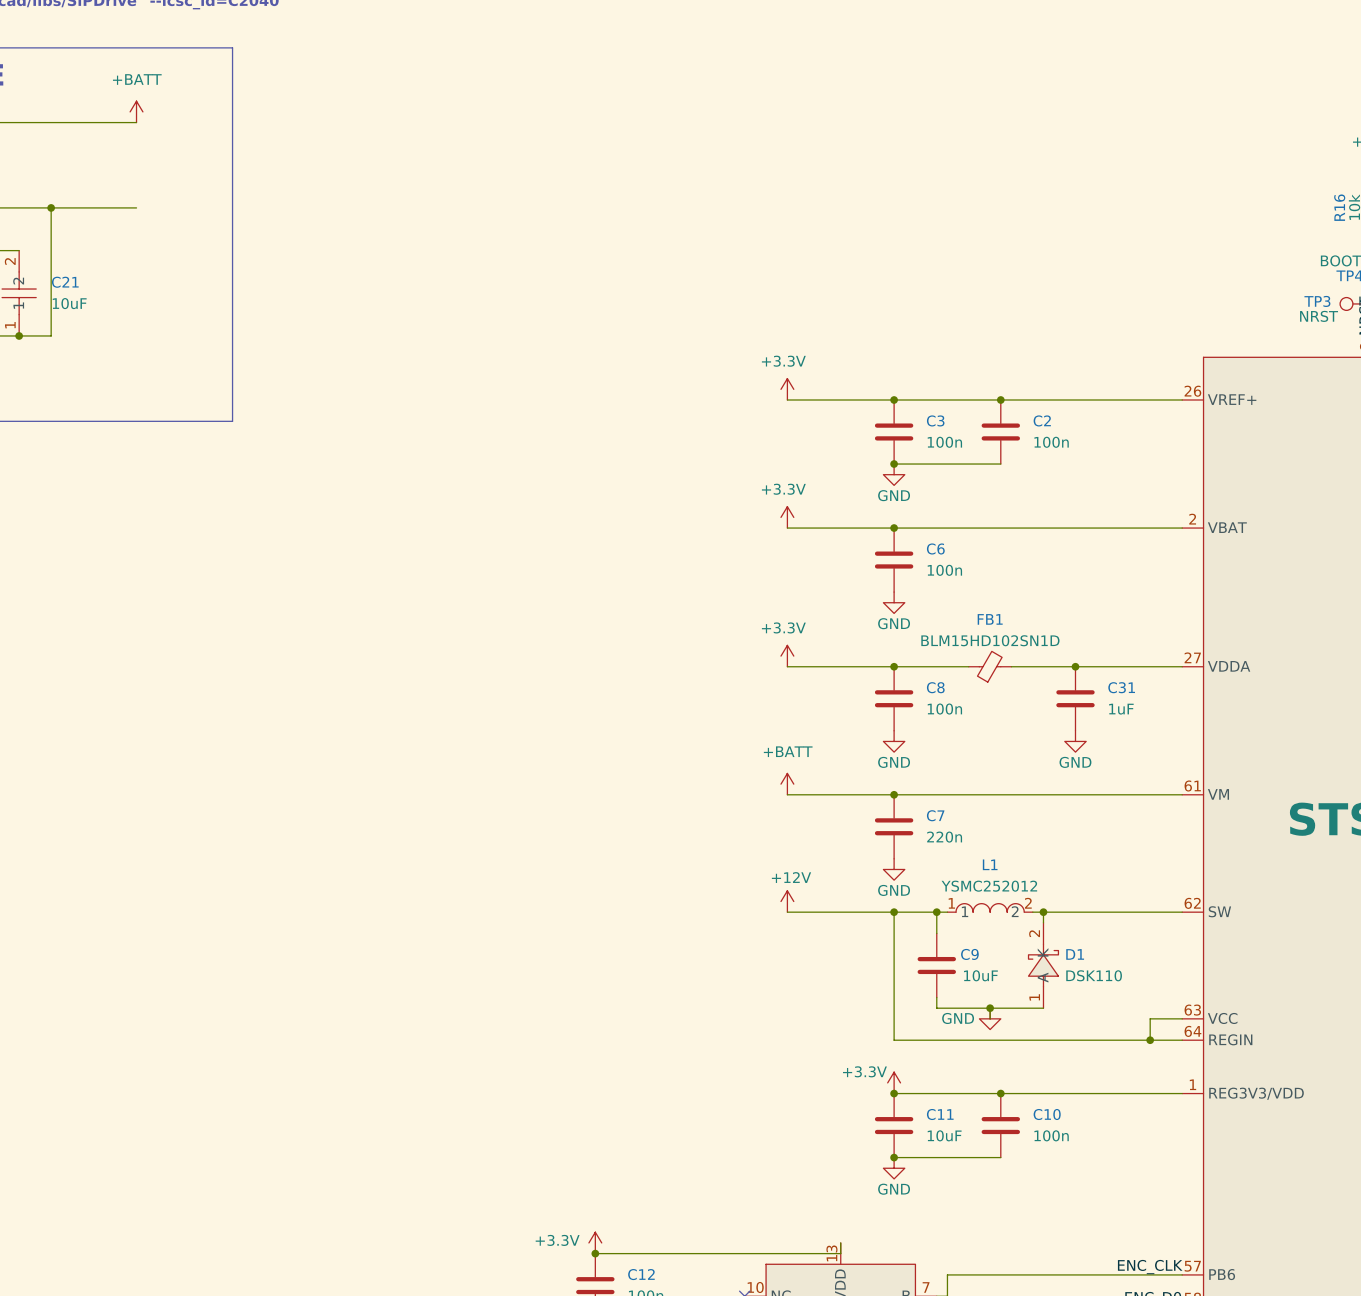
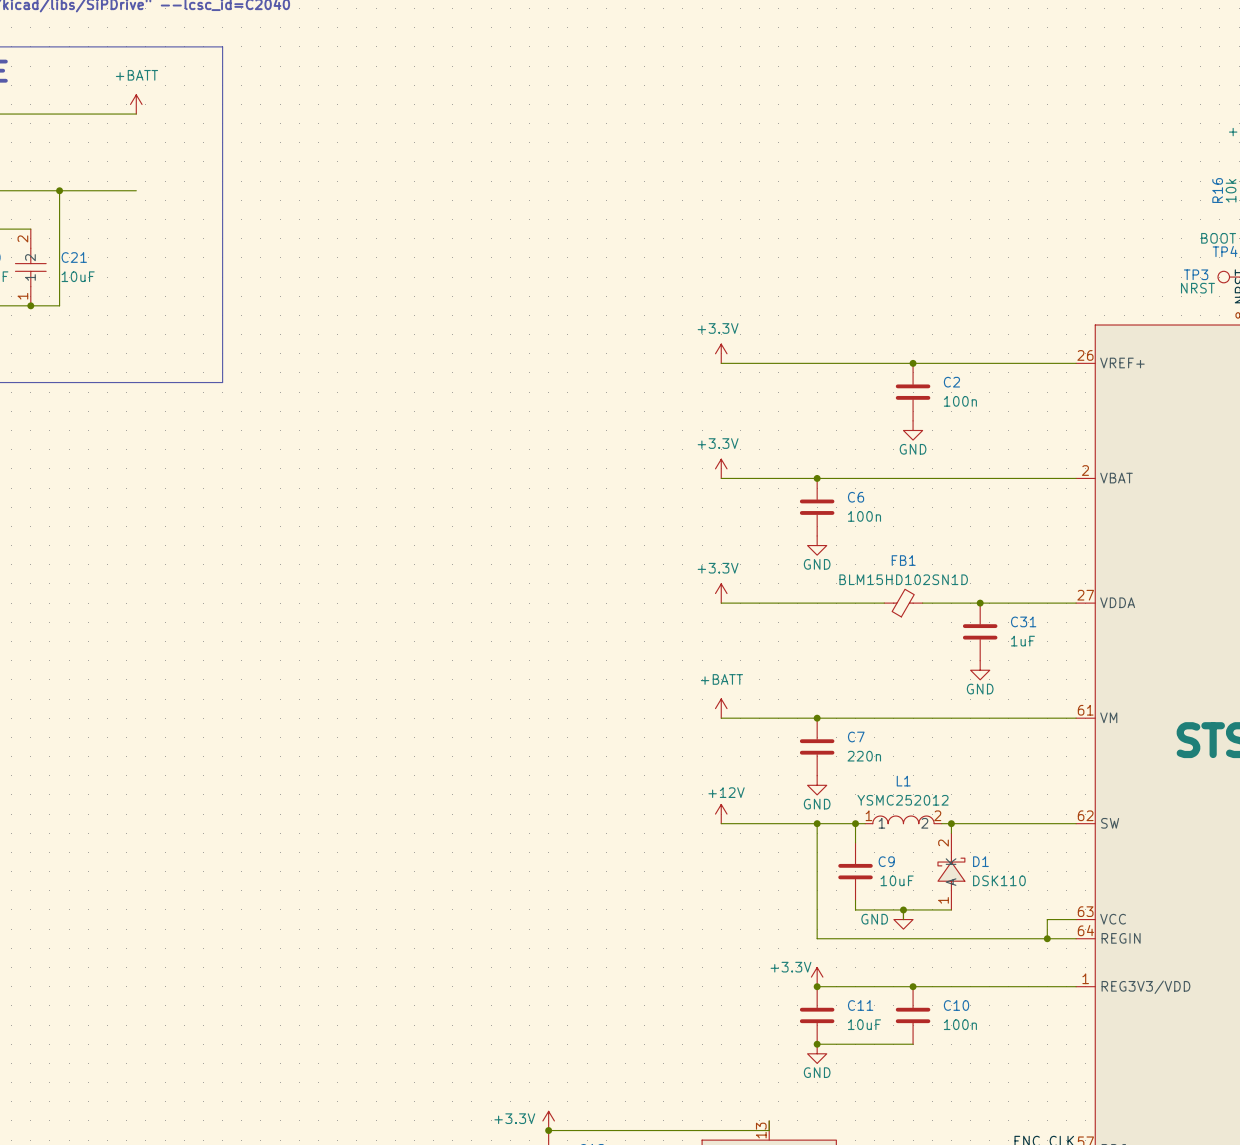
junction: (894, 400) -> none
C3: 100n (894, 432) -> none
wire: (894, 464) (1000, 464) -> none
junction: (894, 464) -> none
power symbol position: GND (894, 474) -> GND (913, 430)
junction: (894, 666) -> none
C8: 100n (894, 698) -> none
power symbol: GND (894, 741) -> none

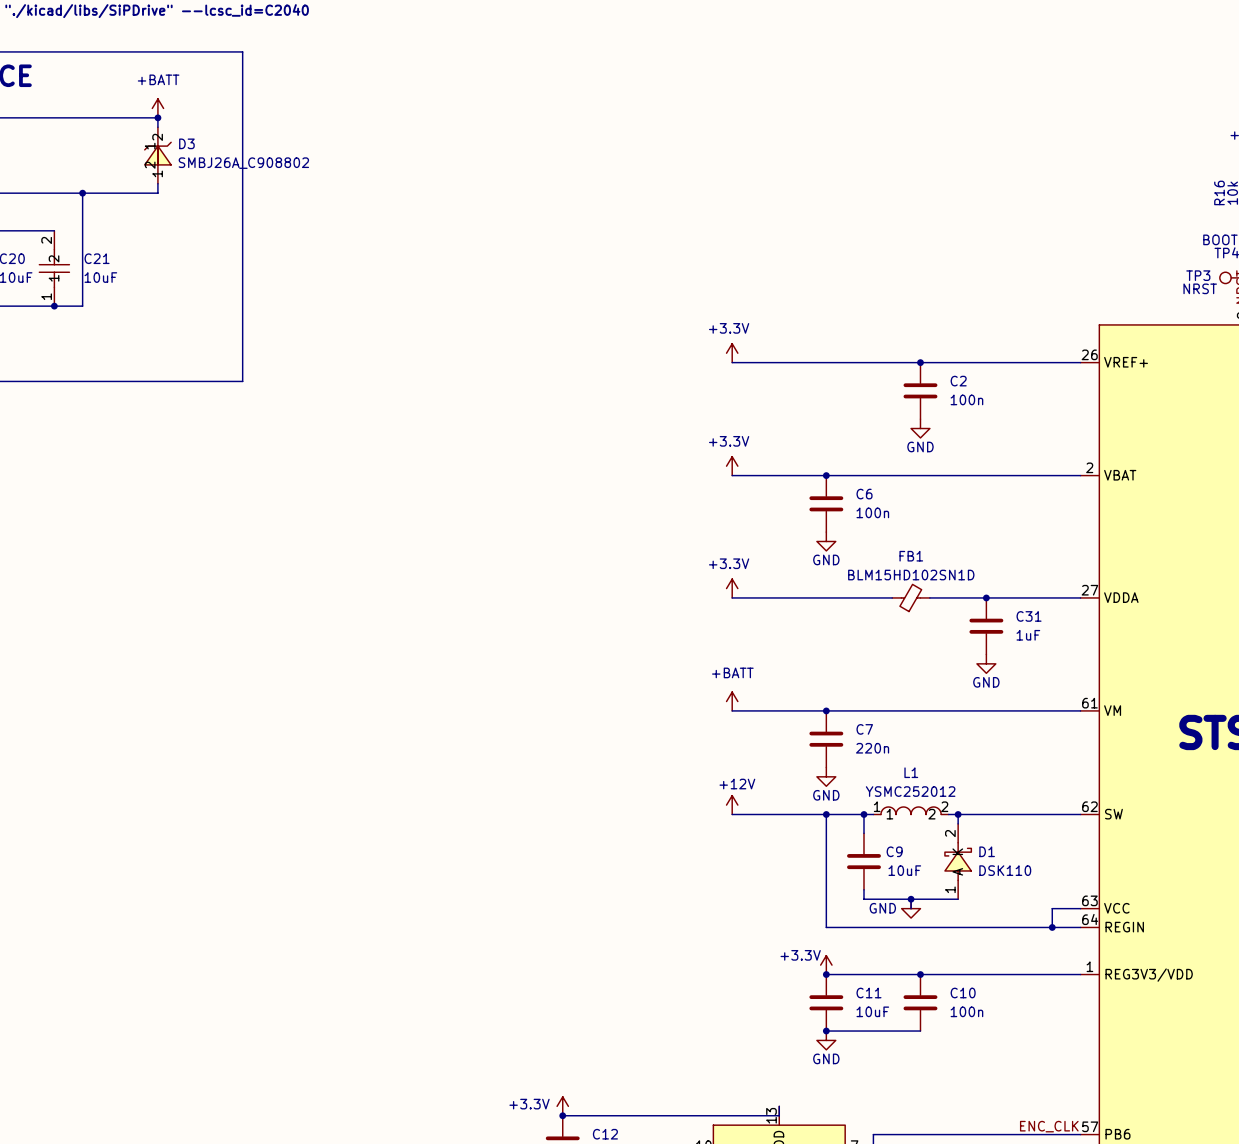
wire: none -> (157, 117) (157, 127)
junction: none -> (157, 117)
D3: none -> SMBJ26A_C908802 (157, 155)
wire: none -> (157, 183) (157, 193)

